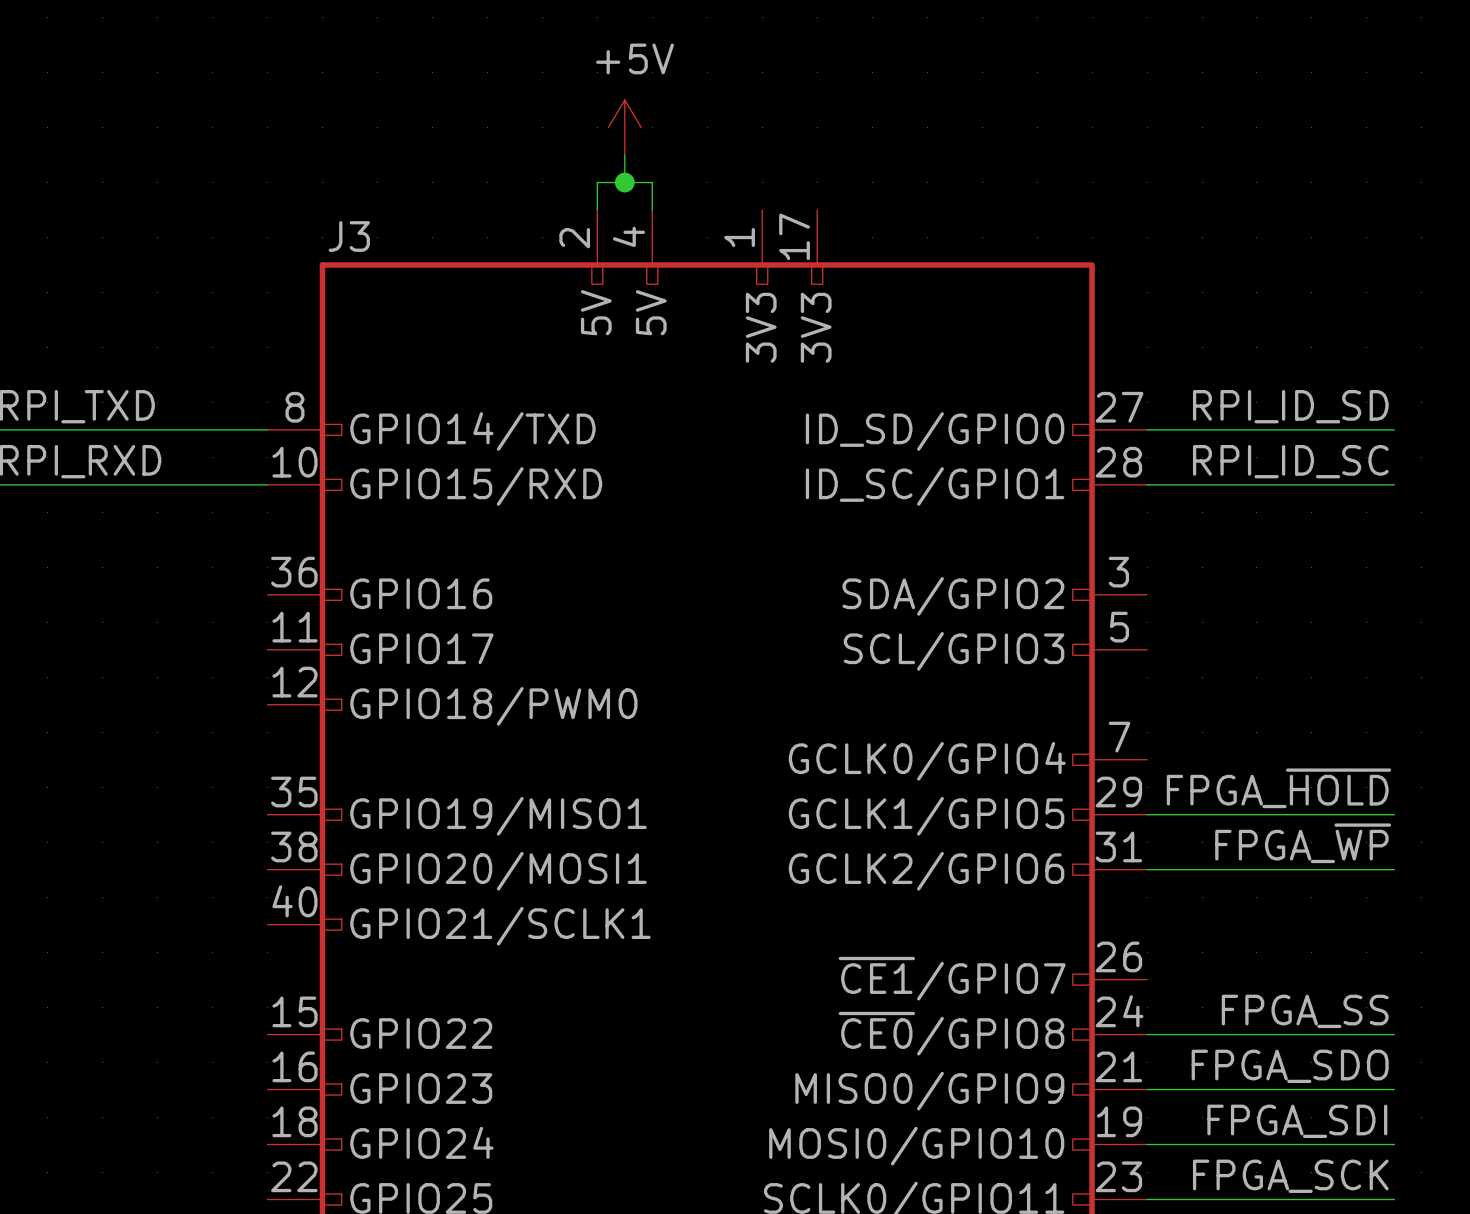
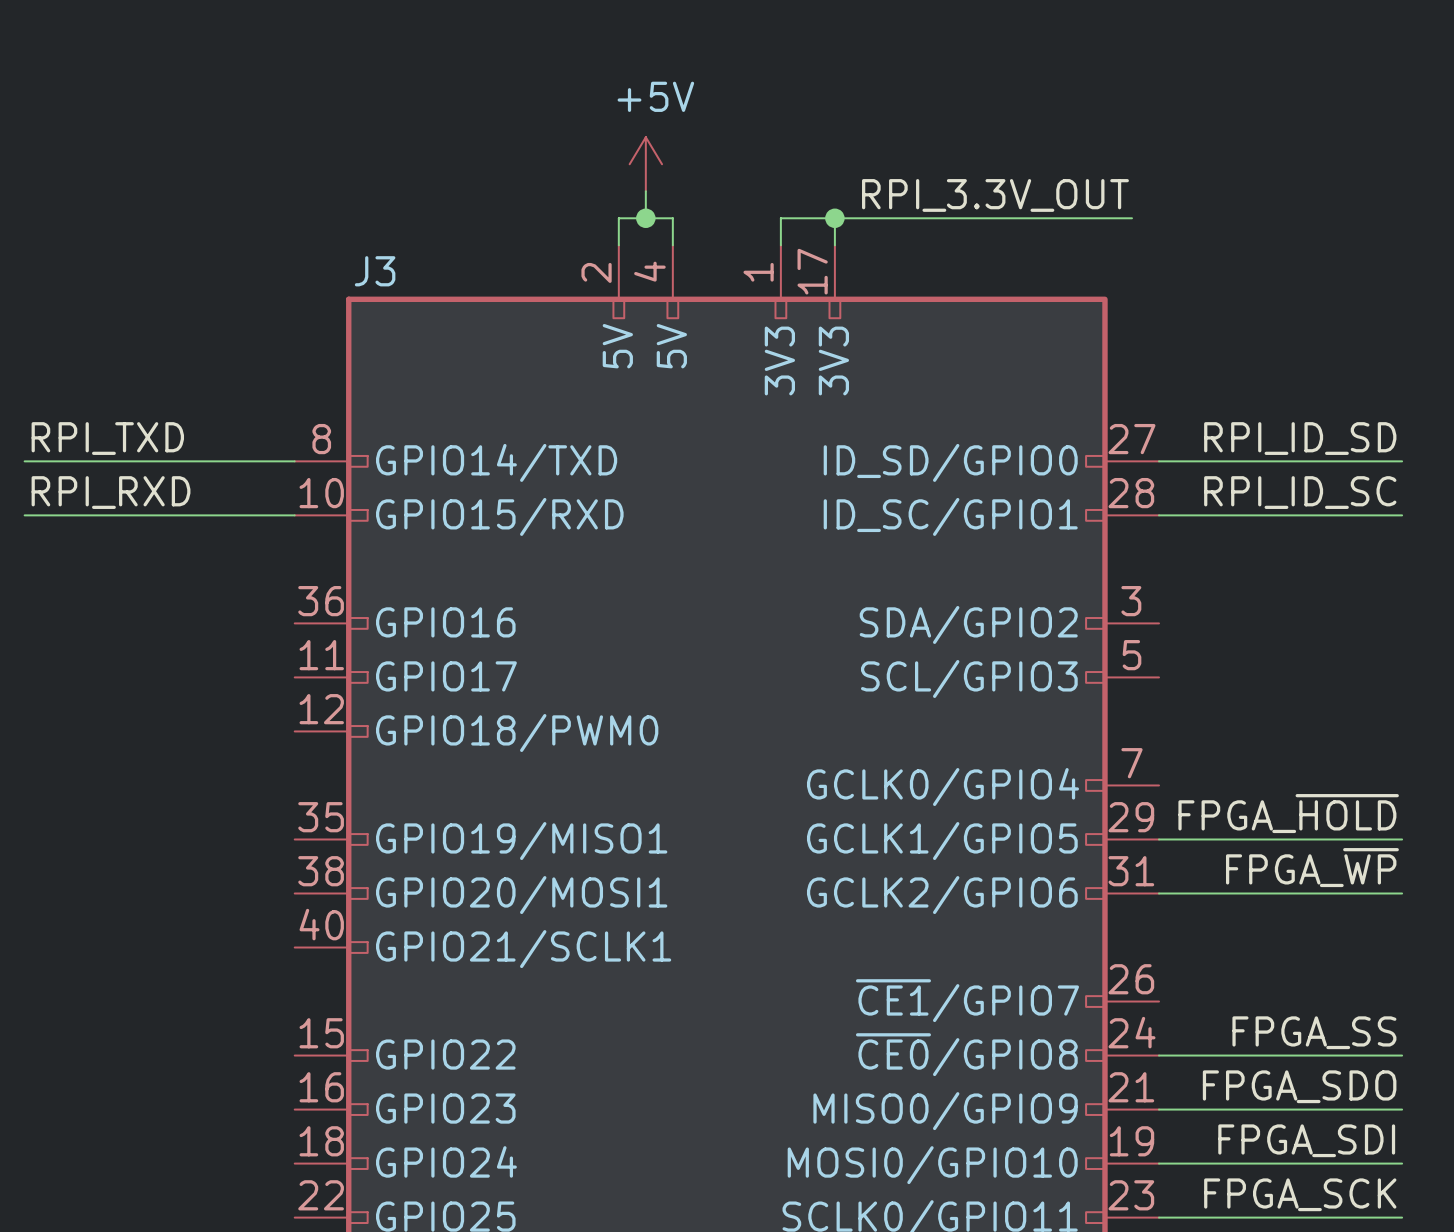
label: none -> RPI_3.3V_OUT (995, 195)
wire: none -> (834, 218) (834, 245)
junction: none -> (834, 218)
wire: none -> (1131, 218) (780, 218) (780, 245)

